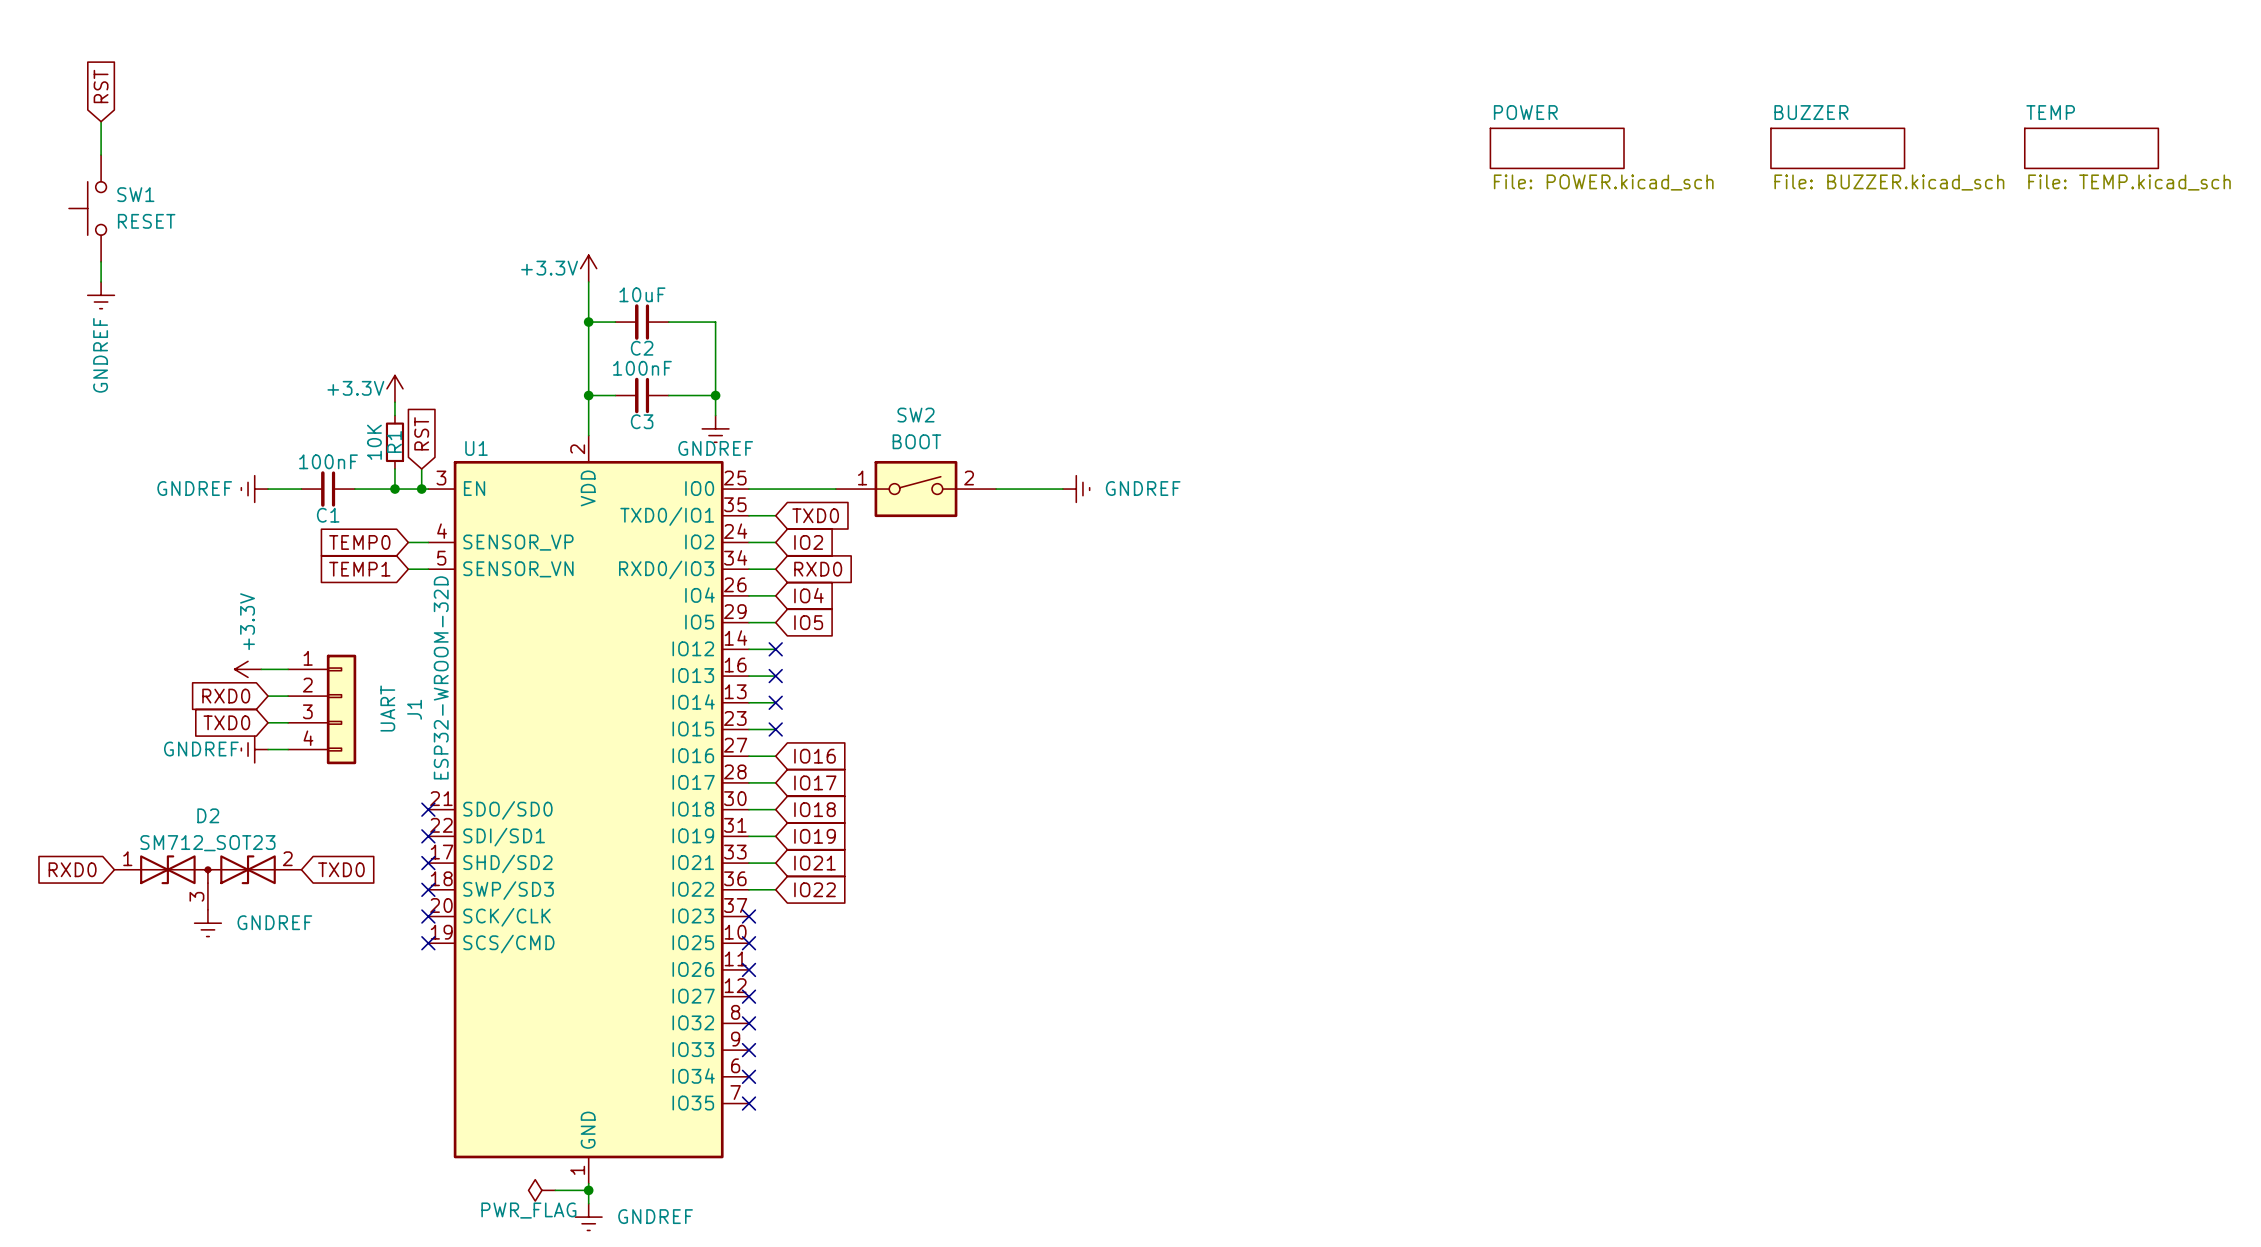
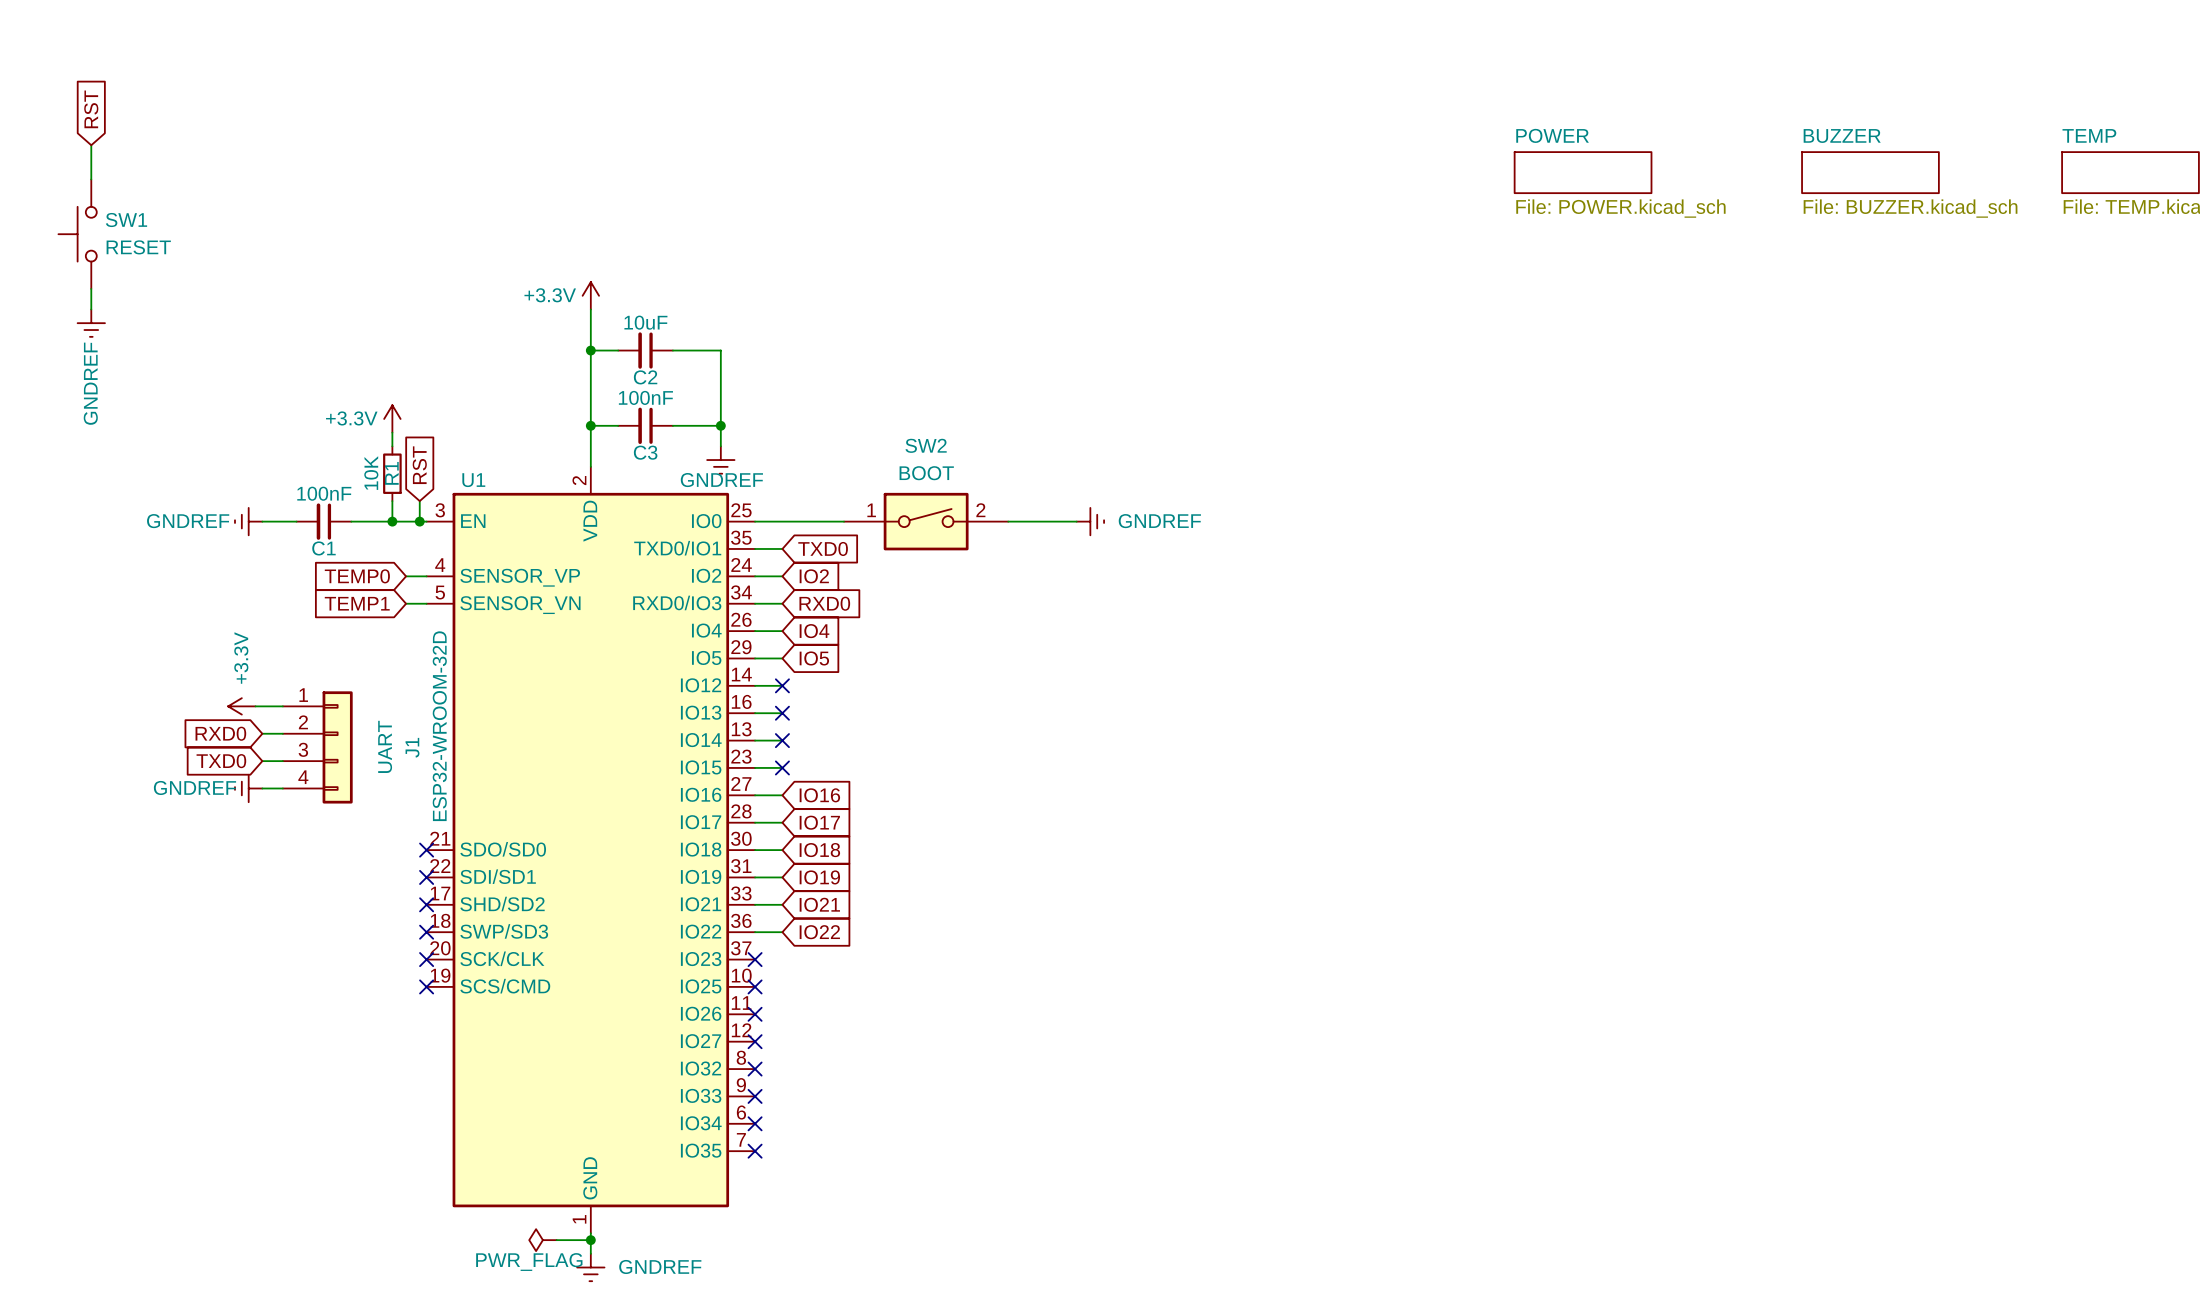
global label: RXD0 (72, 869) -> none
global label: TXD0 (341, 869) -> none
D2: SM712_SOT23 (207, 882) -> none
power symbol: GNDREF (207, 923) -> none

